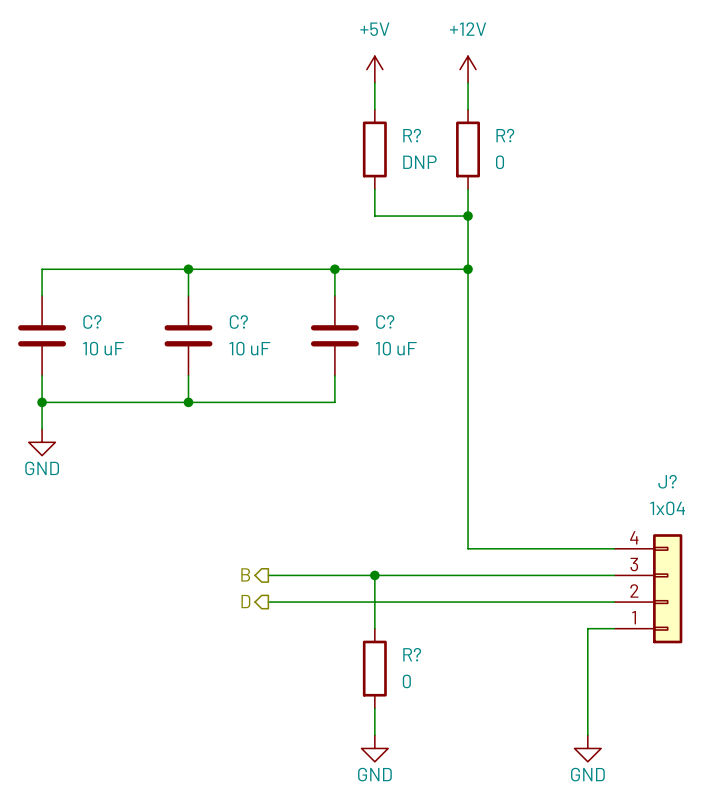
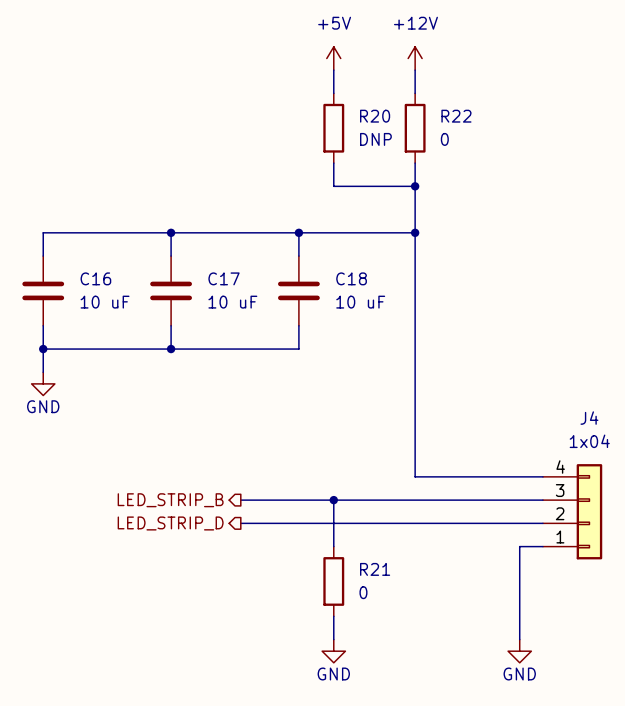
R? name: R? (412, 135) -> R20 (375, 116)
R? name: R? (505, 135) -> R22 (456, 116)
C? name: C? (92, 322) -> C16 (95, 278)
C? name: C? (238, 322) -> C17 (224, 278)
C? name: C? (385, 322) -> C18 (351, 278)
J? name: J? (667, 481) -> J4 (589, 418)
hierarchical label: B (245, 574) -> LED_STRIP_B (170, 500)
hierarchical label: D (245, 601) -> LED_STRIP_D (170, 523)
R? name: R? (412, 654) -> R21 (375, 569)

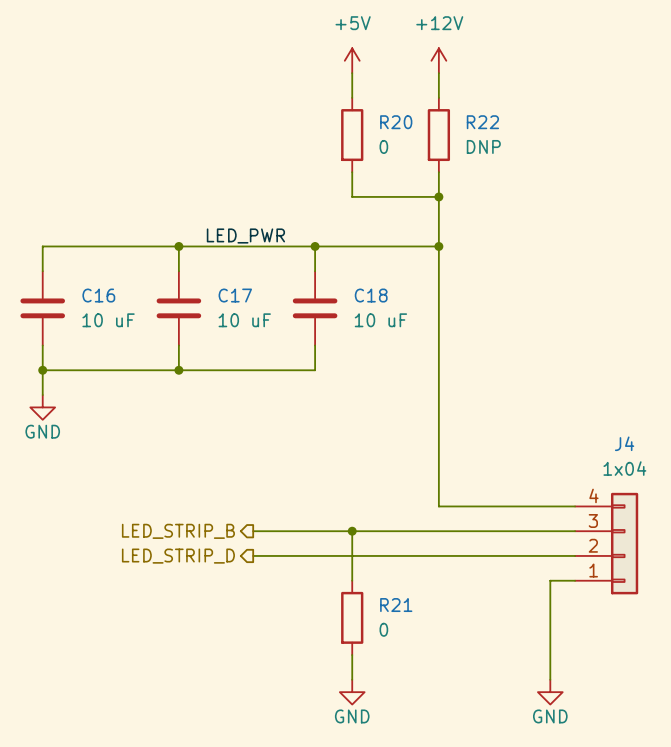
R20 text: DNP (375, 139) -> 0 (383, 146)
R22 text: 0 (444, 139) -> DNP (483, 146)
label: none -> LED_PWR (245, 236)

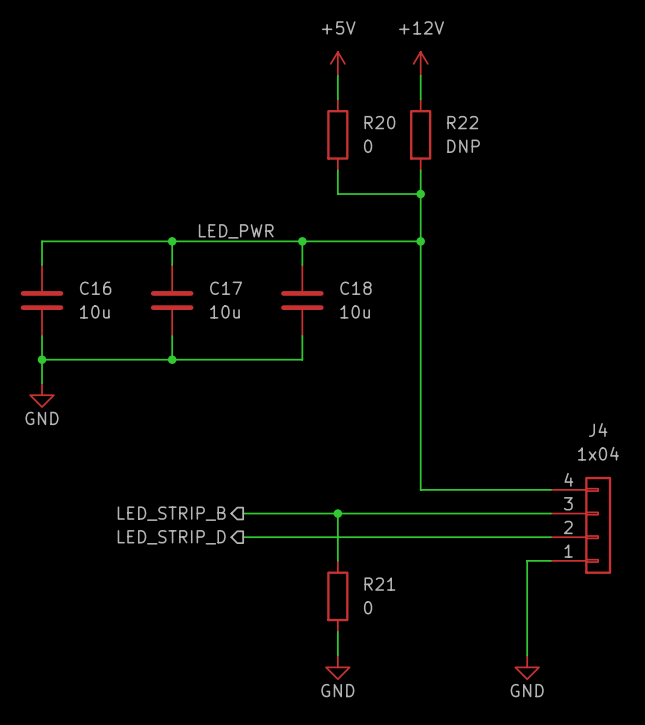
C16 text: 10 uF (108, 320) -> 10u (94, 311)
C17 text: 10 uF (244, 320) -> 10u (224, 311)
C18 text: 10 uF (380, 320) -> 10u (355, 311)

